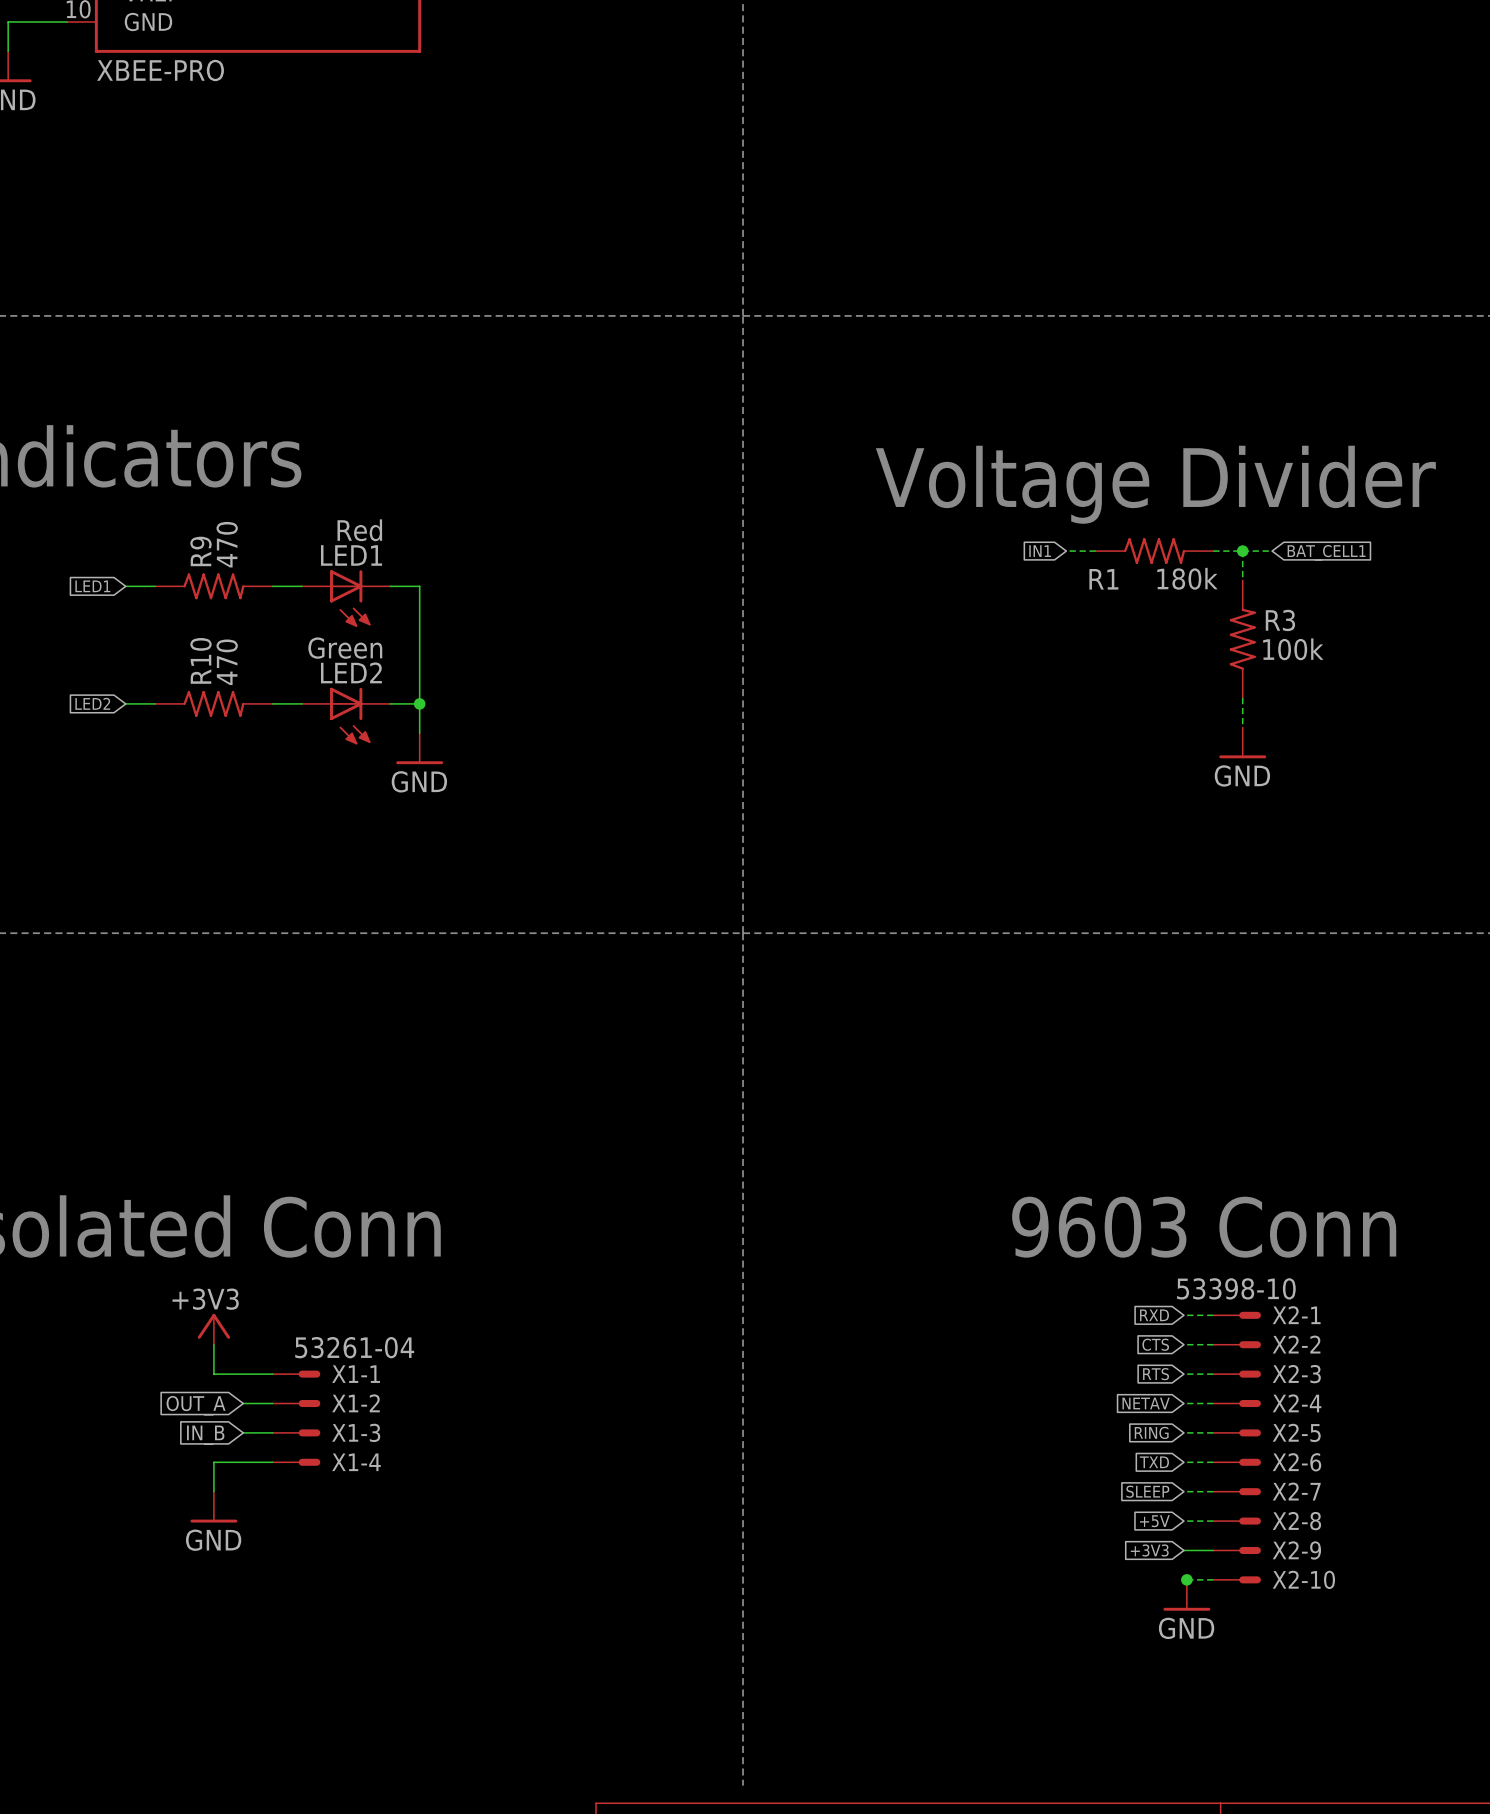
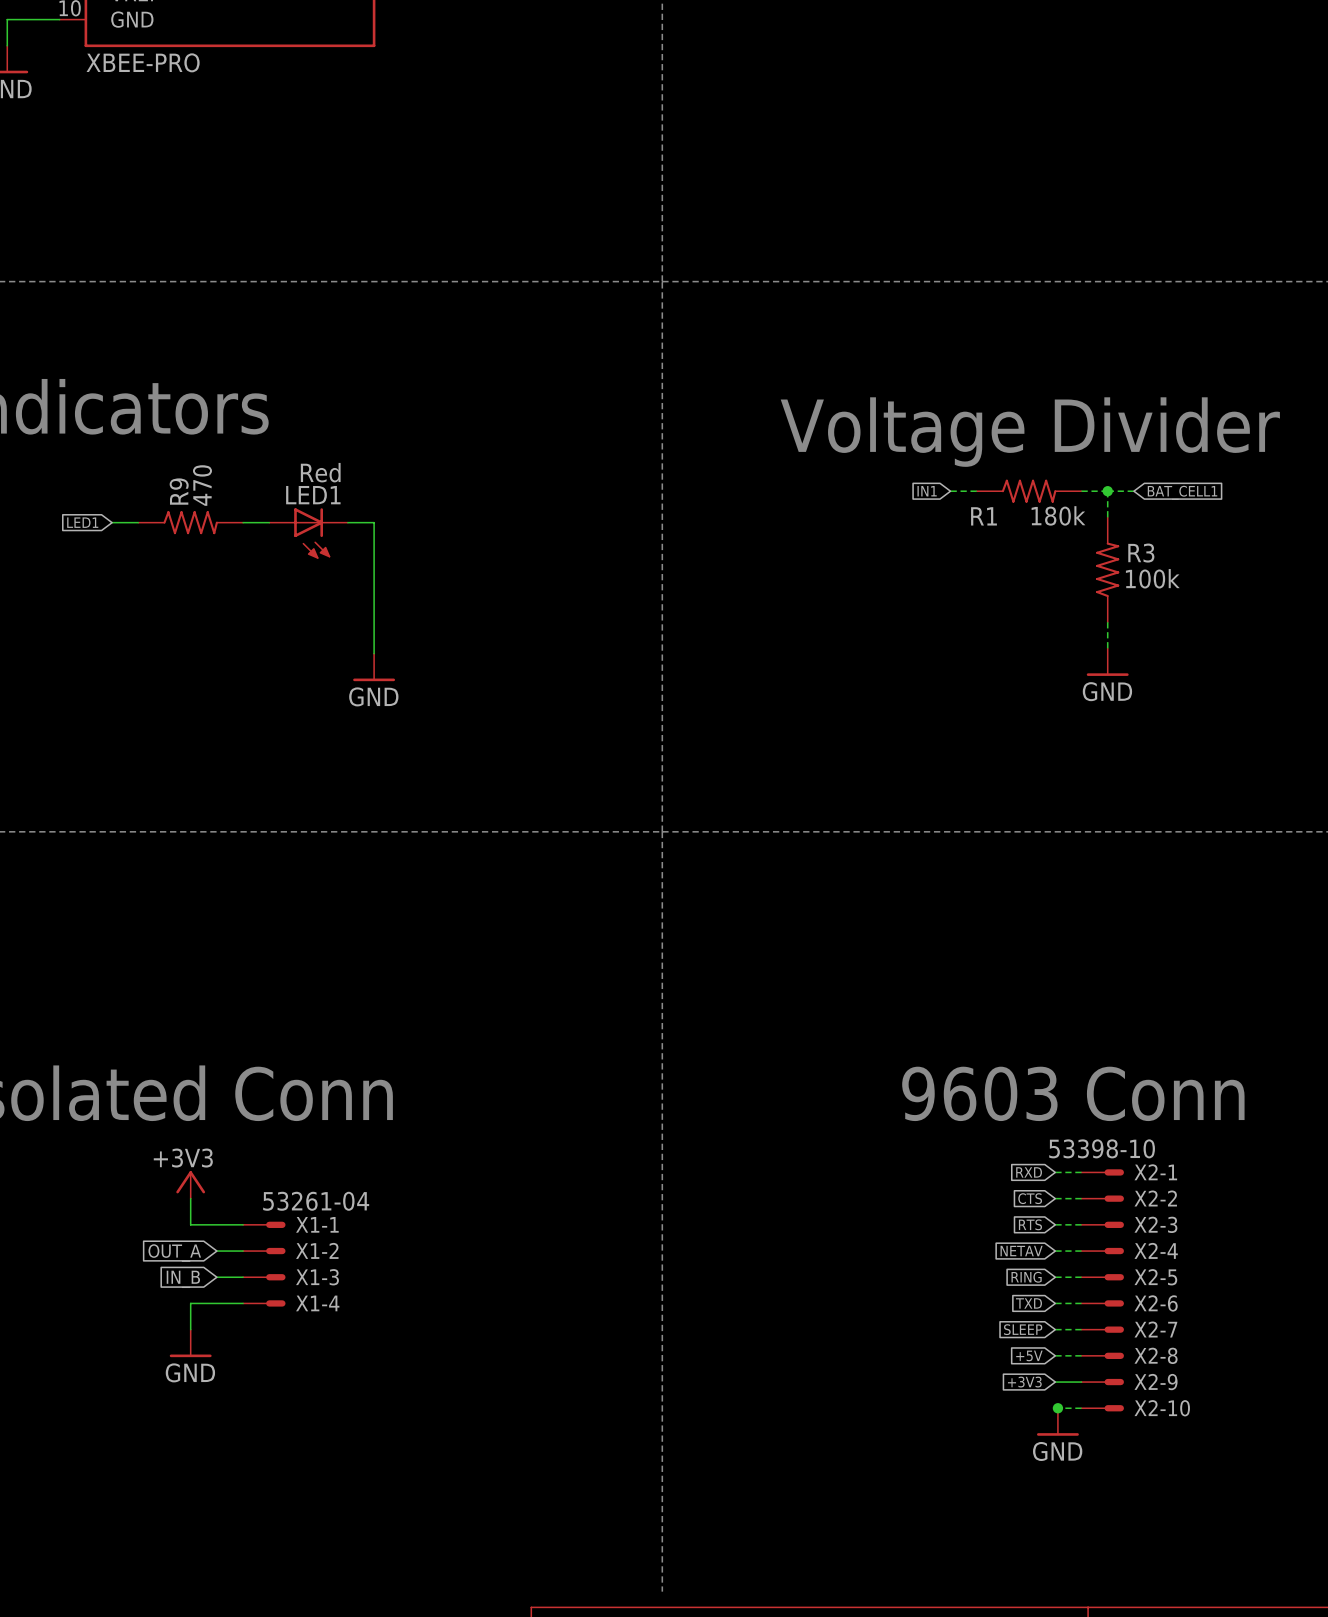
global label: LED2 (92, 703) -> none
wire: (125, 703) (155, 703) -> none
R10: 470 (213, 703) -> none
wire: (272, 703) (302, 703) -> none
wire: (390, 703) (419, 703) -> none
junction: (419, 703) -> none
LED2: Green (346, 716) -> none

